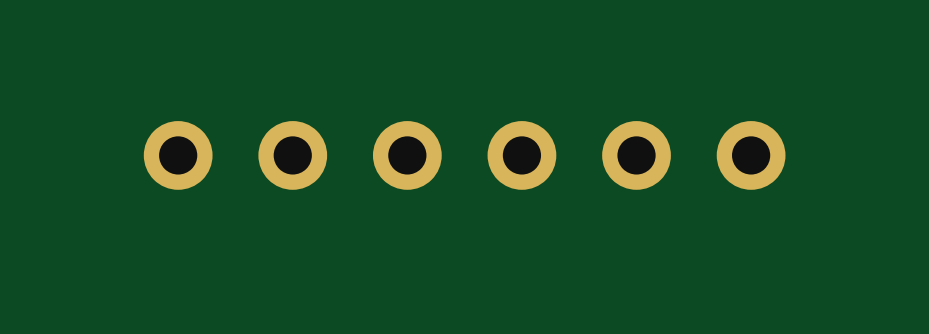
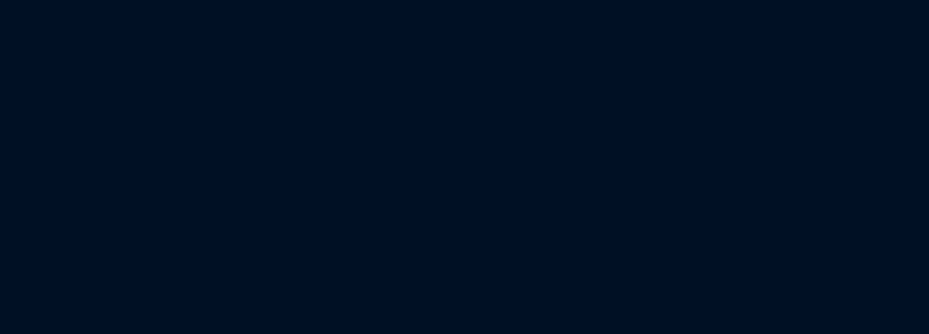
part: (178, 155) -> none
part: (292, 155) -> none
part: (407, 155) -> none
part: (521, 155) -> none
part: (636, 155) -> none
part: (751, 155) -> none

